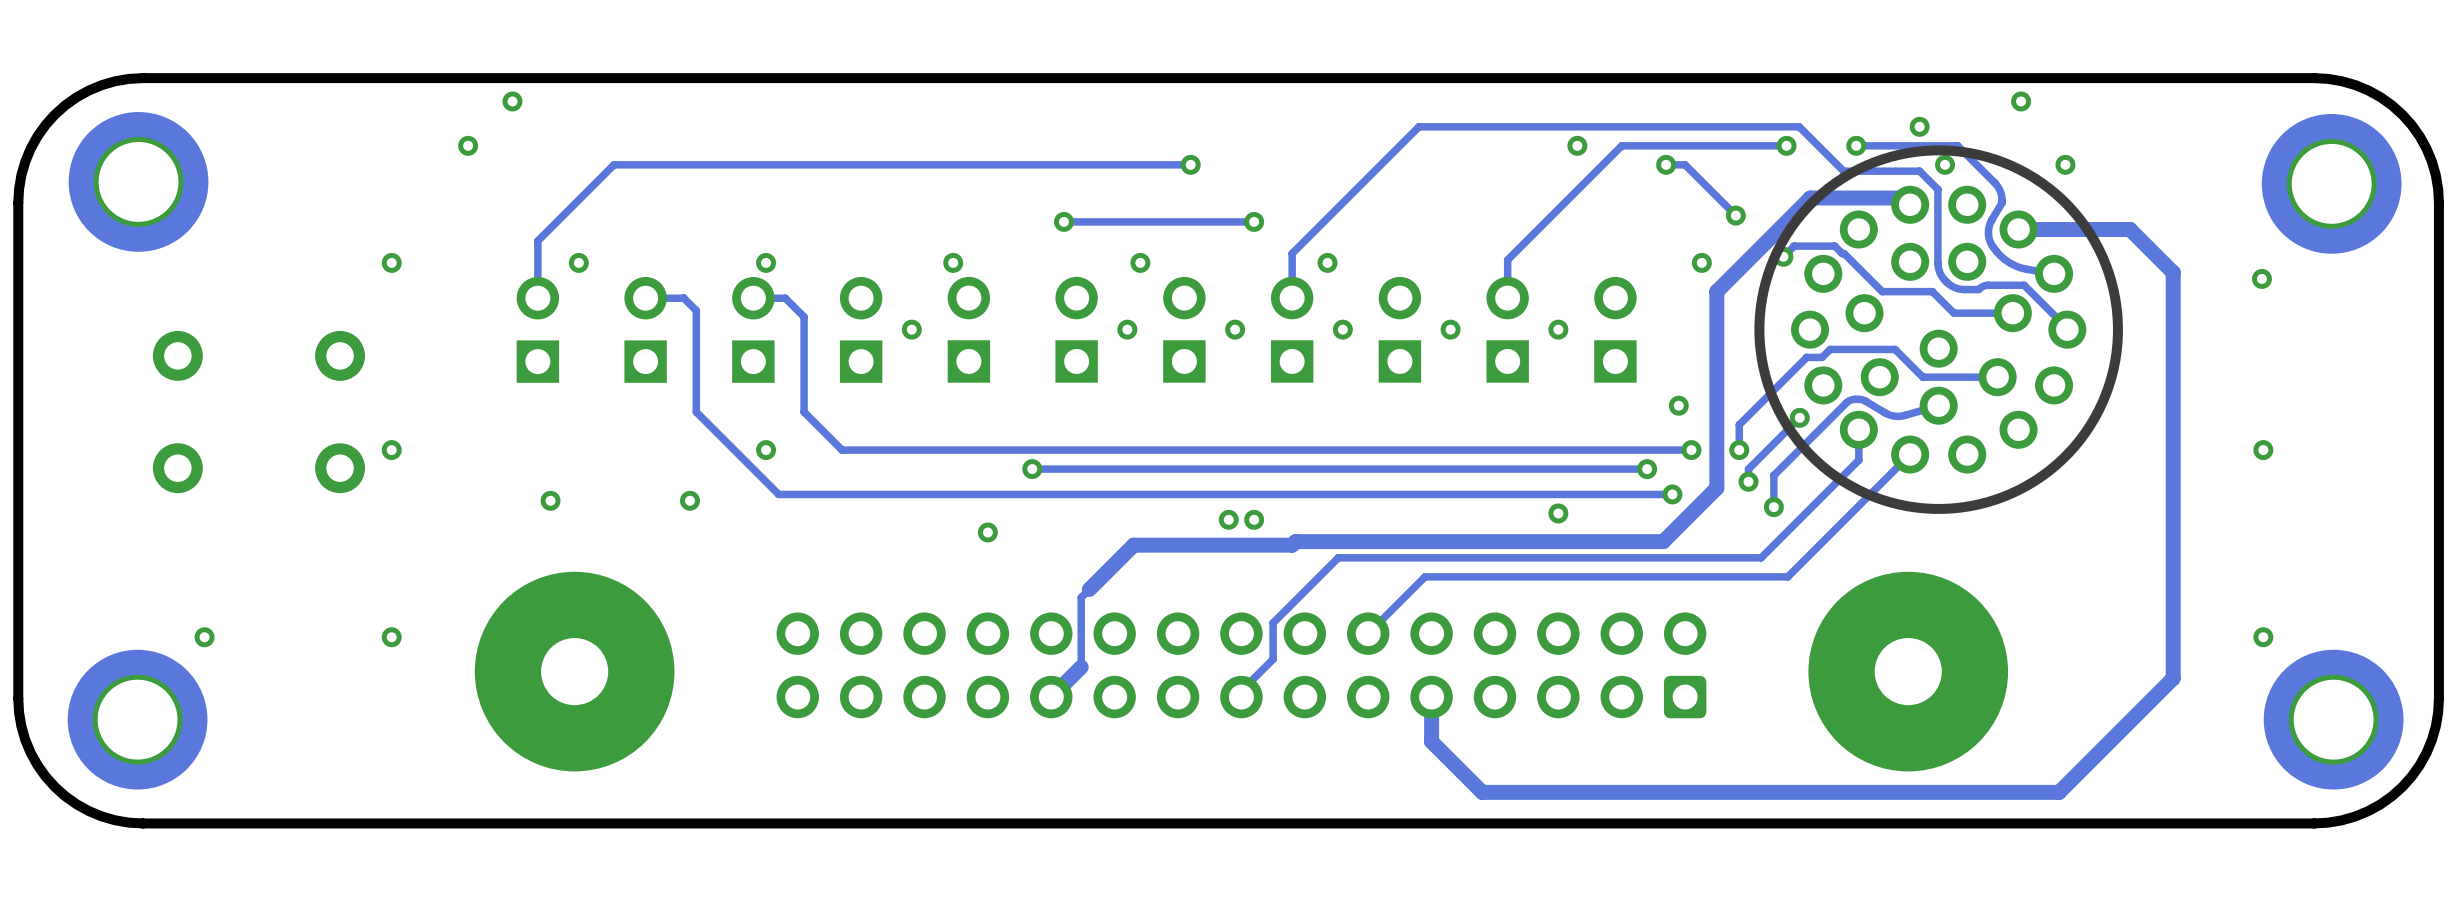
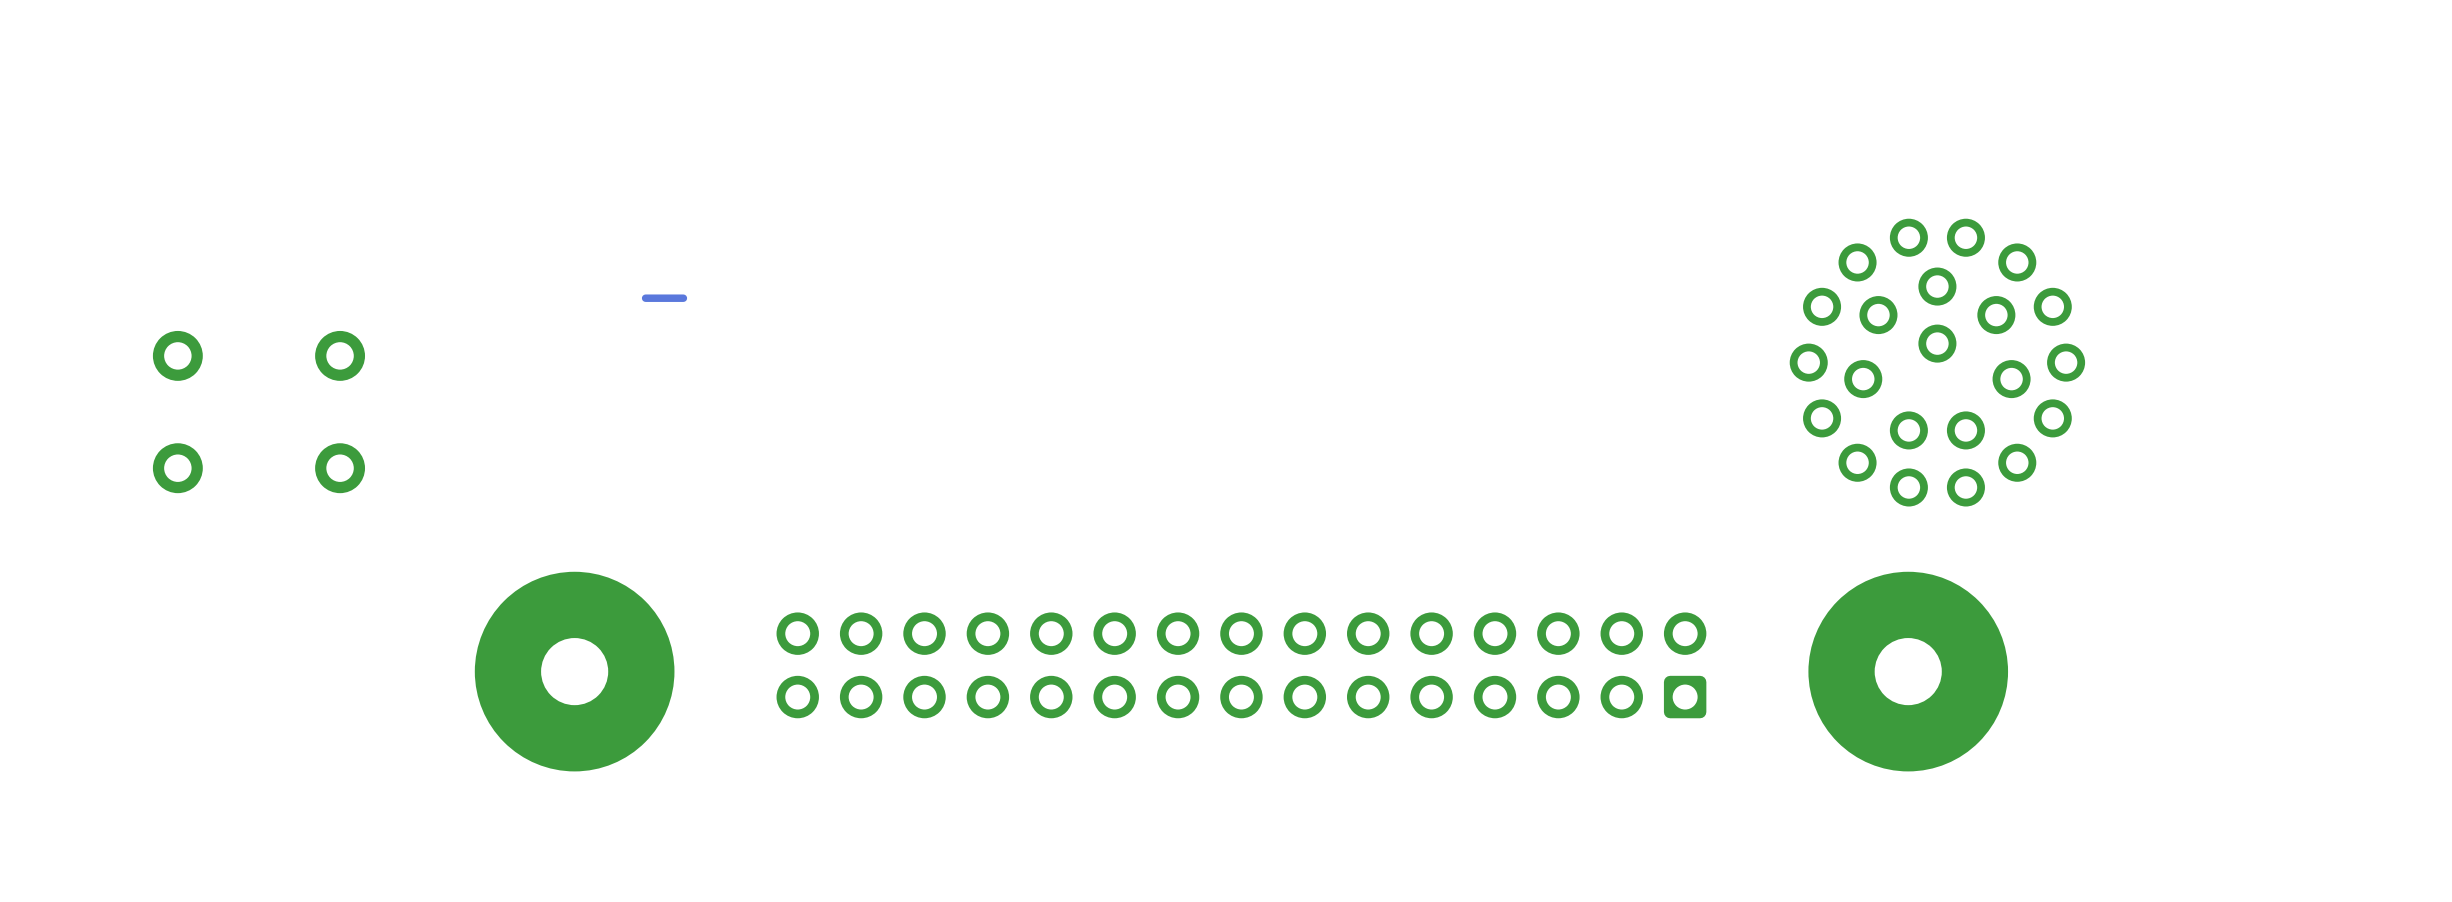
board edge: (2314, 78) (143, 78) (115, 81) (88, 90) (76, 97) (54, 114) (45, 125) (30, 148) (25, 161) (19, 188) (18, 698) (21, 726) (25, 739) (37, 765) (54, 786) (65, 796) (76, 804) (101, 816) (129, 822) (143, 823) (2314, 823) (2341, 820) (2355, 816) (2380, 804) (2402, 786) (2419, 765) (2426, 752) (2435, 726) (2438, 712) (2438, 202) (2435, 175) (2426, 148) (2419, 136) (2402, 114) (2380, 97) (2355, 85) (2328, 78) (2314, 78) -> none
via: (512, 101) -> none
via: (2021, 101) -> none
via: (1919, 126) -> none
via: (468, 145) -> none
via: (1577, 145) -> none
drawing: [1754, 145, 2123, 514] -> none
track: (1786, 145) (1621, 145) (1507, 259) (1507, 298) -> none
via: (1786, 145) -> none
track: (1856, 145) (1957, 145) (1994, 182) (2000, 193) (2002, 202) (1988, 228) (1989, 240) (1993, 248) (2005, 259) (2015, 265) (2054, 273) -> none
via: (1856, 145) -> none
track: (1190, 164) (613, 164) (537, 240) (537, 298) -> none
via: (1190, 164) -> none
track: (1666, 164) (1685, 164) (1735, 215) -> none
via: (1666, 164) -> none
via: (1945, 164) -> none
via: (2065, 164) -> none
part: (138, 181) -> none
part: (2331, 183) -> none
track: (1910, 204) (1903, 198) (1810, 198) (1716, 291) (1716, 488) (1663, 541) (1295, 541) (1292, 545) (1133, 545) (1081, 597) (1081, 667) (1051, 697) -> none
via: (1735, 215) -> none
via: (1063, 221) -> none
track: (1254, 221) (1063, 221) -> none
via: (1254, 221) -> none
track: (2018, 229) (2130, 229) (2173, 272) (2173, 678) (2059, 792) (1482, 792) (1431, 741) (1431, 697) -> none
track: (1783, 256) (1794, 246) (1834, 246) (1882, 291) (1932, 291) (1953, 313) (2012, 313) -> none
via: (1783, 256) -> none
via: (391, 262) -> none
via: (578, 262) -> none
via: (766, 262) -> none
via: (953, 262) -> none
via: (1140, 262) -> none
via: (1327, 262) -> none
via: (1701, 262) -> none
via: (2261, 278) -> none
track: (683, 297) (696, 310) (696, 412) (778, 494) (1672, 494) -> none
track: (753, 298) (785, 298) (804, 316) (804, 412) (842, 450) (1691, 450) -> none
track: (1292, 298) (1292, 253) (1418, 126) (1799, 126) (1843, 171) (1919, 171) (1937, 189) (1938, 265) (1945, 280) (1952, 286) (1962, 289) (1978, 289) (1986, 285) (2024, 285) (2067, 329) -> none
part: (537, 329) -> none
part: (645, 329) -> none
part: (753, 329) -> none
part: (861, 329) -> none
via: (911, 329) -> none
part: (968, 329) -> none
part: (1076, 329) -> none
via: (1127, 329) -> none
part: (1184, 329) -> none
via: (1235, 329) -> none
part: (1292, 329) -> none
via: (1342, 329) -> none
part: (1399, 329) -> none
via: (1450, 329) -> none
part: (1507, 329) -> none
via: (1558, 329) -> none
part: (1615, 329) -> none
part rotation: 0° (1938, 329) -> 180° (1937, 362)
track: (1997, 377) (1922, 377) (1895, 349) (1830, 349) (1822, 357) (1806, 357) (1739, 424) (1739, 450) -> none
via: (1678, 405) -> none
track: (1938, 405) (1897, 416) (1887, 414) (1862, 399) (1848, 401) (1773, 475) (1773, 507) -> none
track: (1799, 417) (1748, 469) (1748, 481) -> none
via: (1799, 417) -> none
track: (1858, 429) (1858, 460) (1761, 557) (1338, 557) (1273, 623) (1273, 659) (1241, 690) (1241, 697) -> none
via: (391, 450) -> none
via: (766, 450) -> none
via: (1691, 450) -> none
via: (1739, 450) -> none
via: (2263, 450) -> none
track: (1910, 454) (1787, 576) (1425, 576) (1368, 633) -> none
via: (1032, 469) -> none
track: (1647, 469) (1032, 469) -> none
via: (1647, 469) -> none
via: (1748, 481) -> none
via: (1672, 494) -> none
via: (550, 500) -> none
via: (689, 500) -> none
via: (1773, 507) -> none
via: (1558, 513) -> none
via: (1228, 519) -> none
via: (1254, 519) -> none
via: (987, 532) -> none
via: (204, 637) -> none
via: (391, 637) -> none
via: (2263, 637) -> none
part: (137, 719) -> none
part: (2333, 719) -> none

